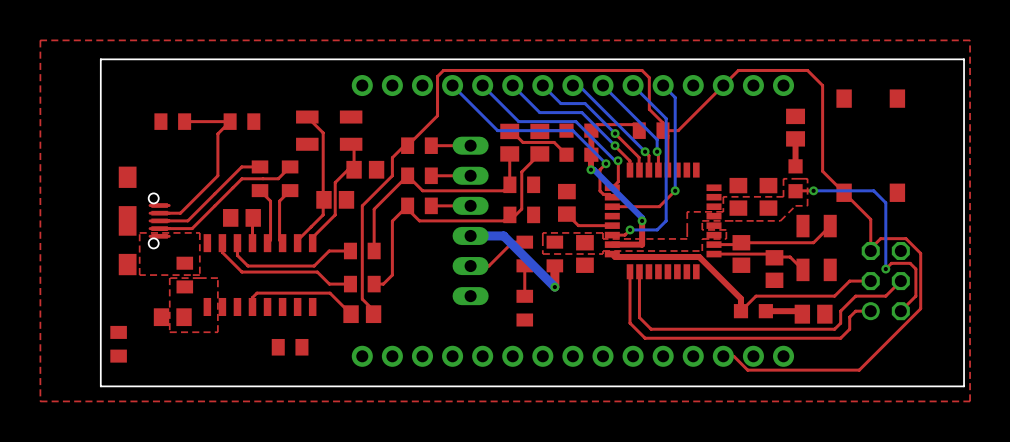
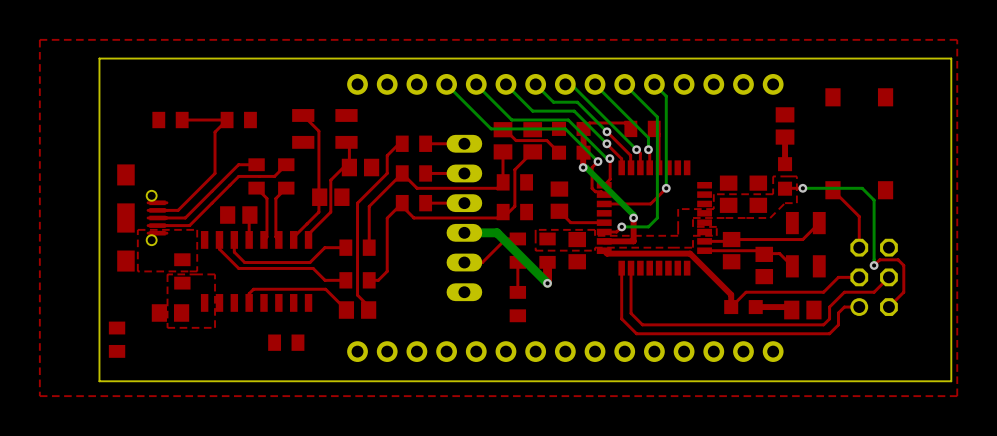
top track: (407, 145) (437, 115) (437, 76) (443, 70) (642, 70) (649, 77) (649, 109) (662, 122) (662, 130) (678, 130) (738, 70) (807, 70) (822, 85) (822, 171) (844, 192) -> none
top track: (870, 248) (880, 238) (905, 238) (920, 253) (920, 308) (859, 370) (747, 370) (733, 356) (723, 356) -> none

